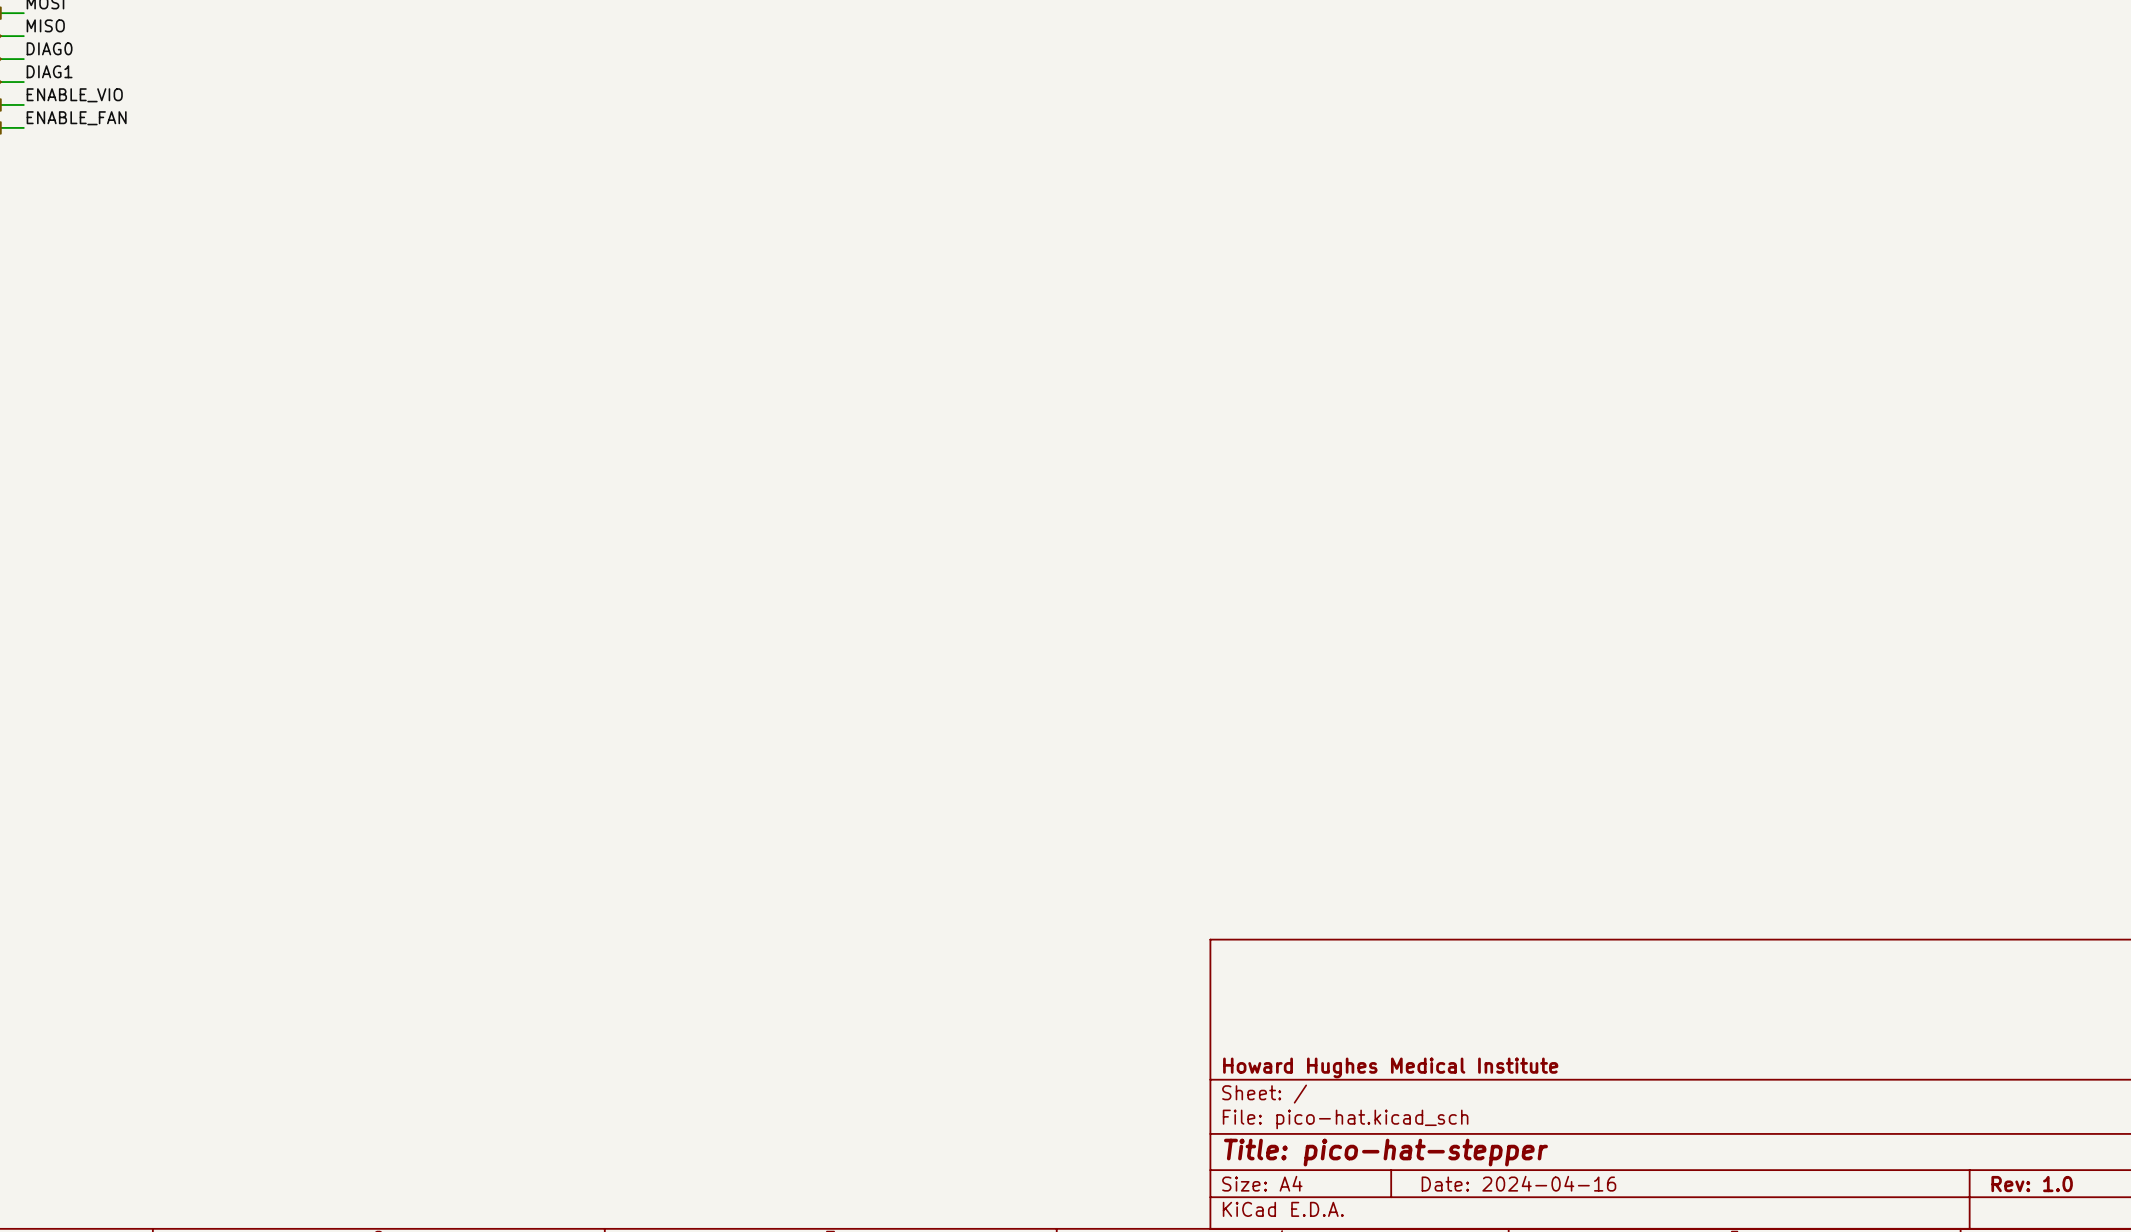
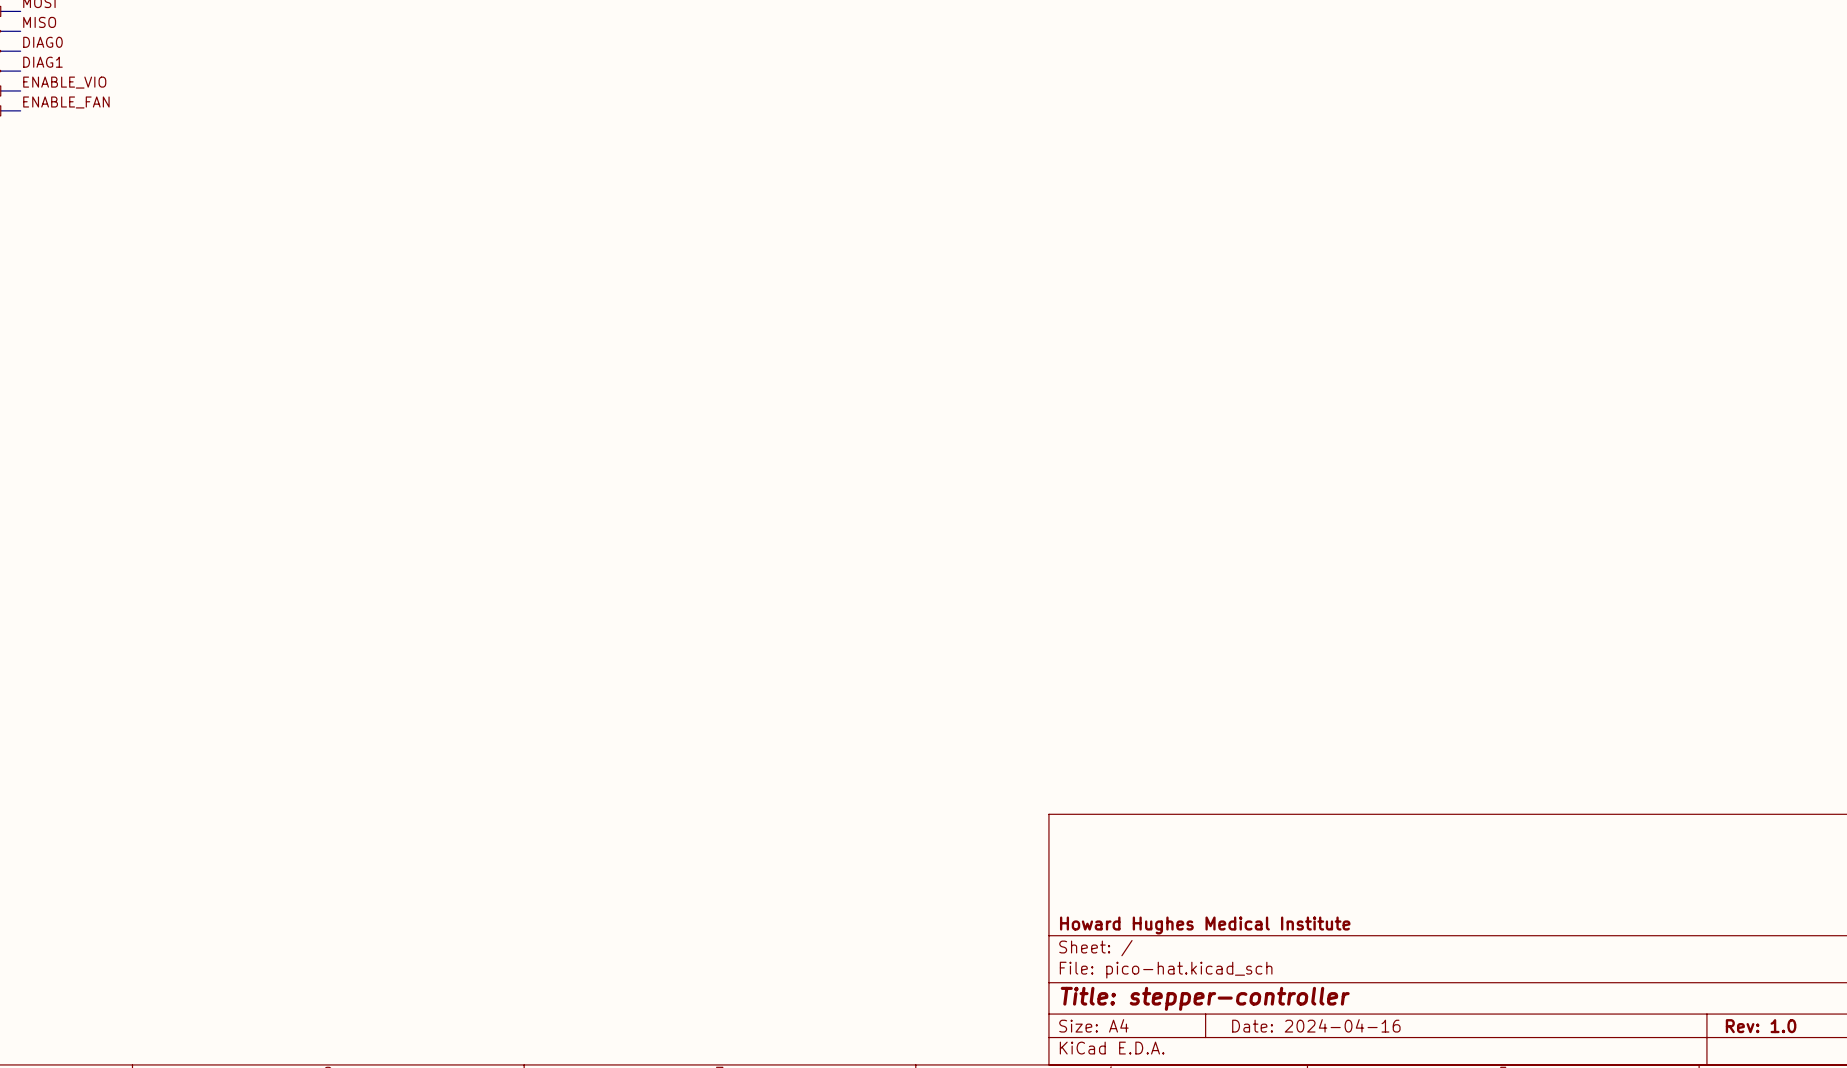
title block: Title: pico-hat-stepper (1385, 1152) -> Title: stepper-controller (1205, 998)

